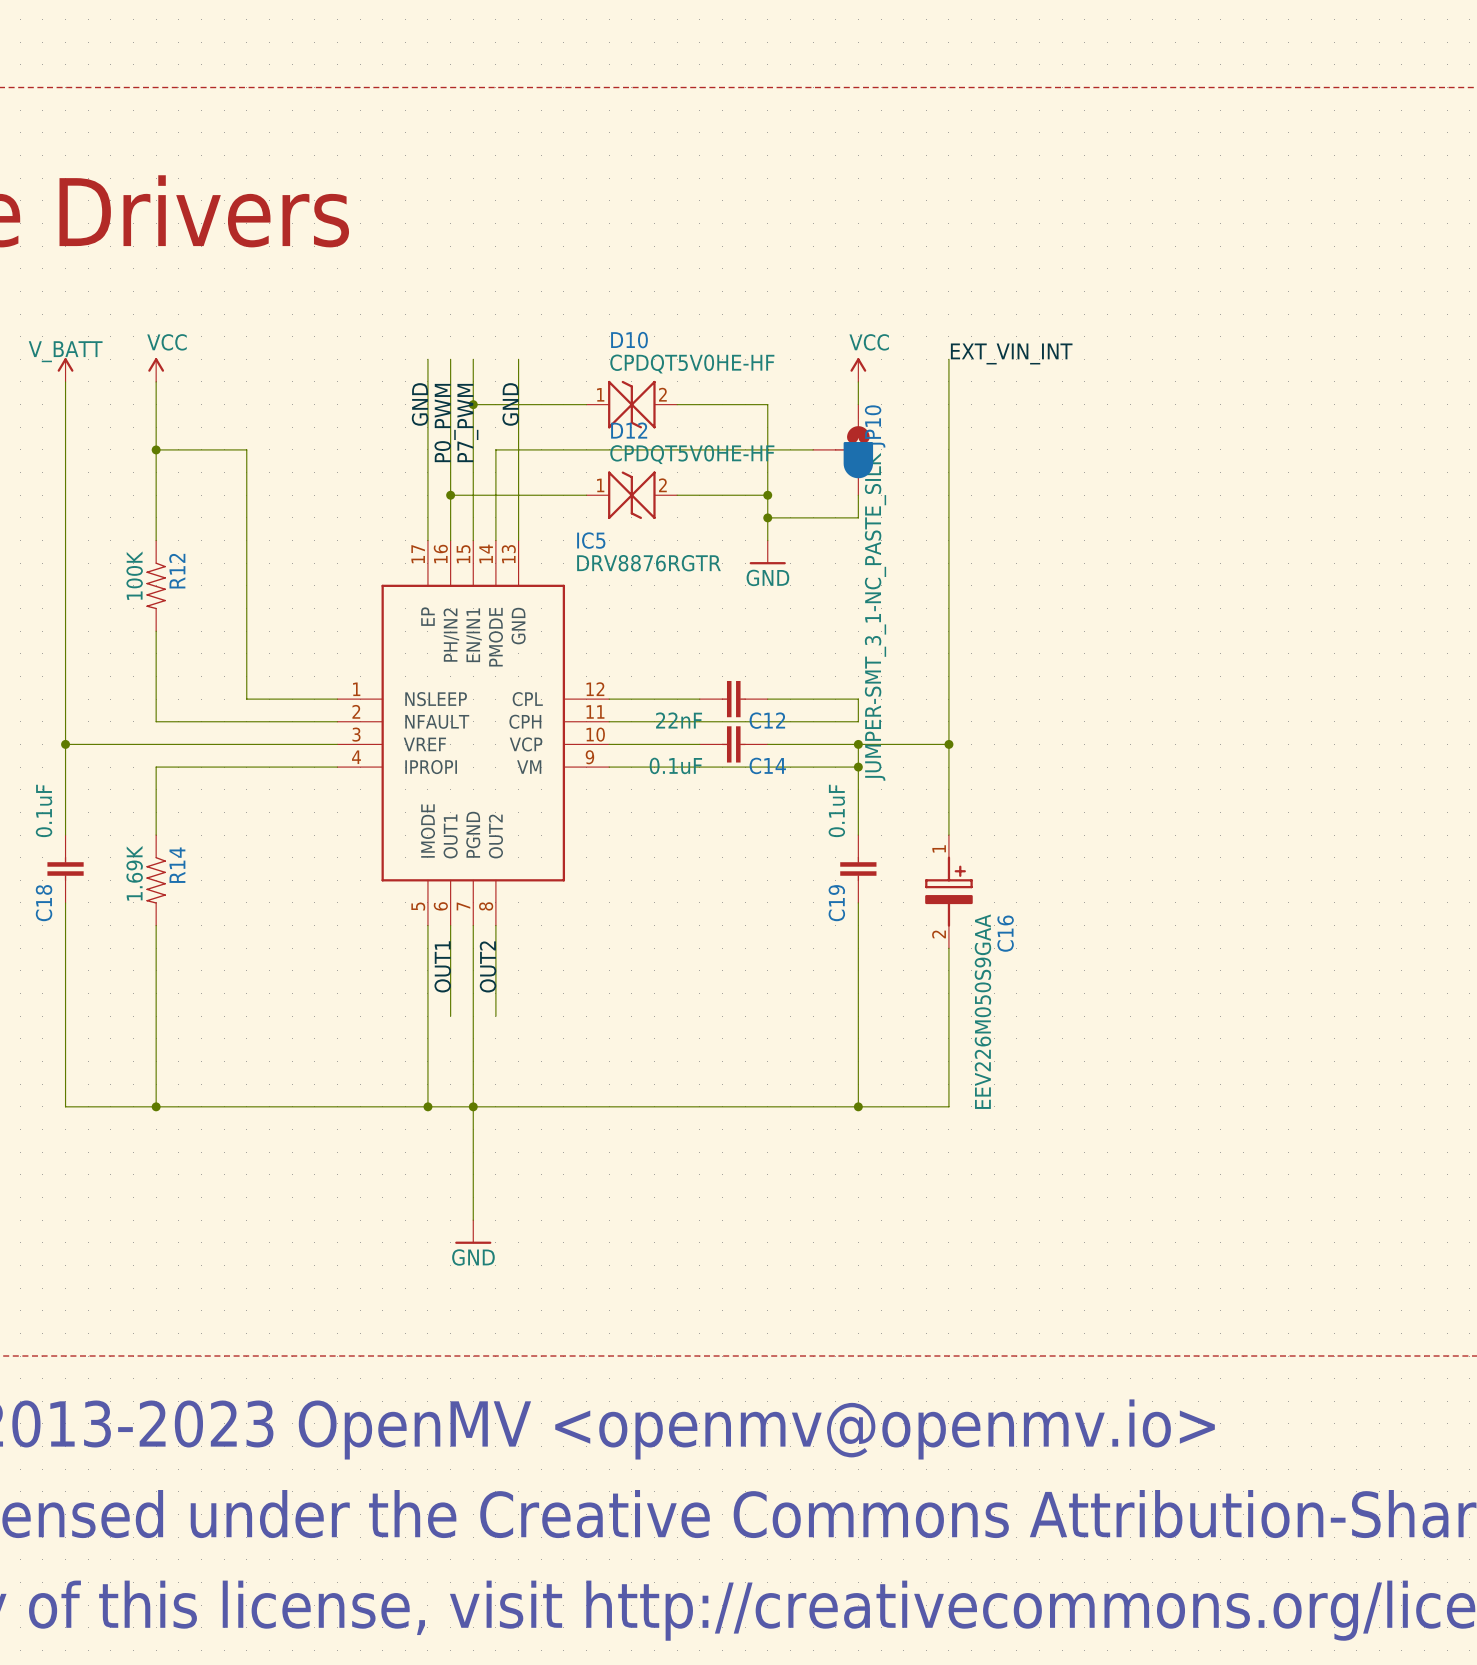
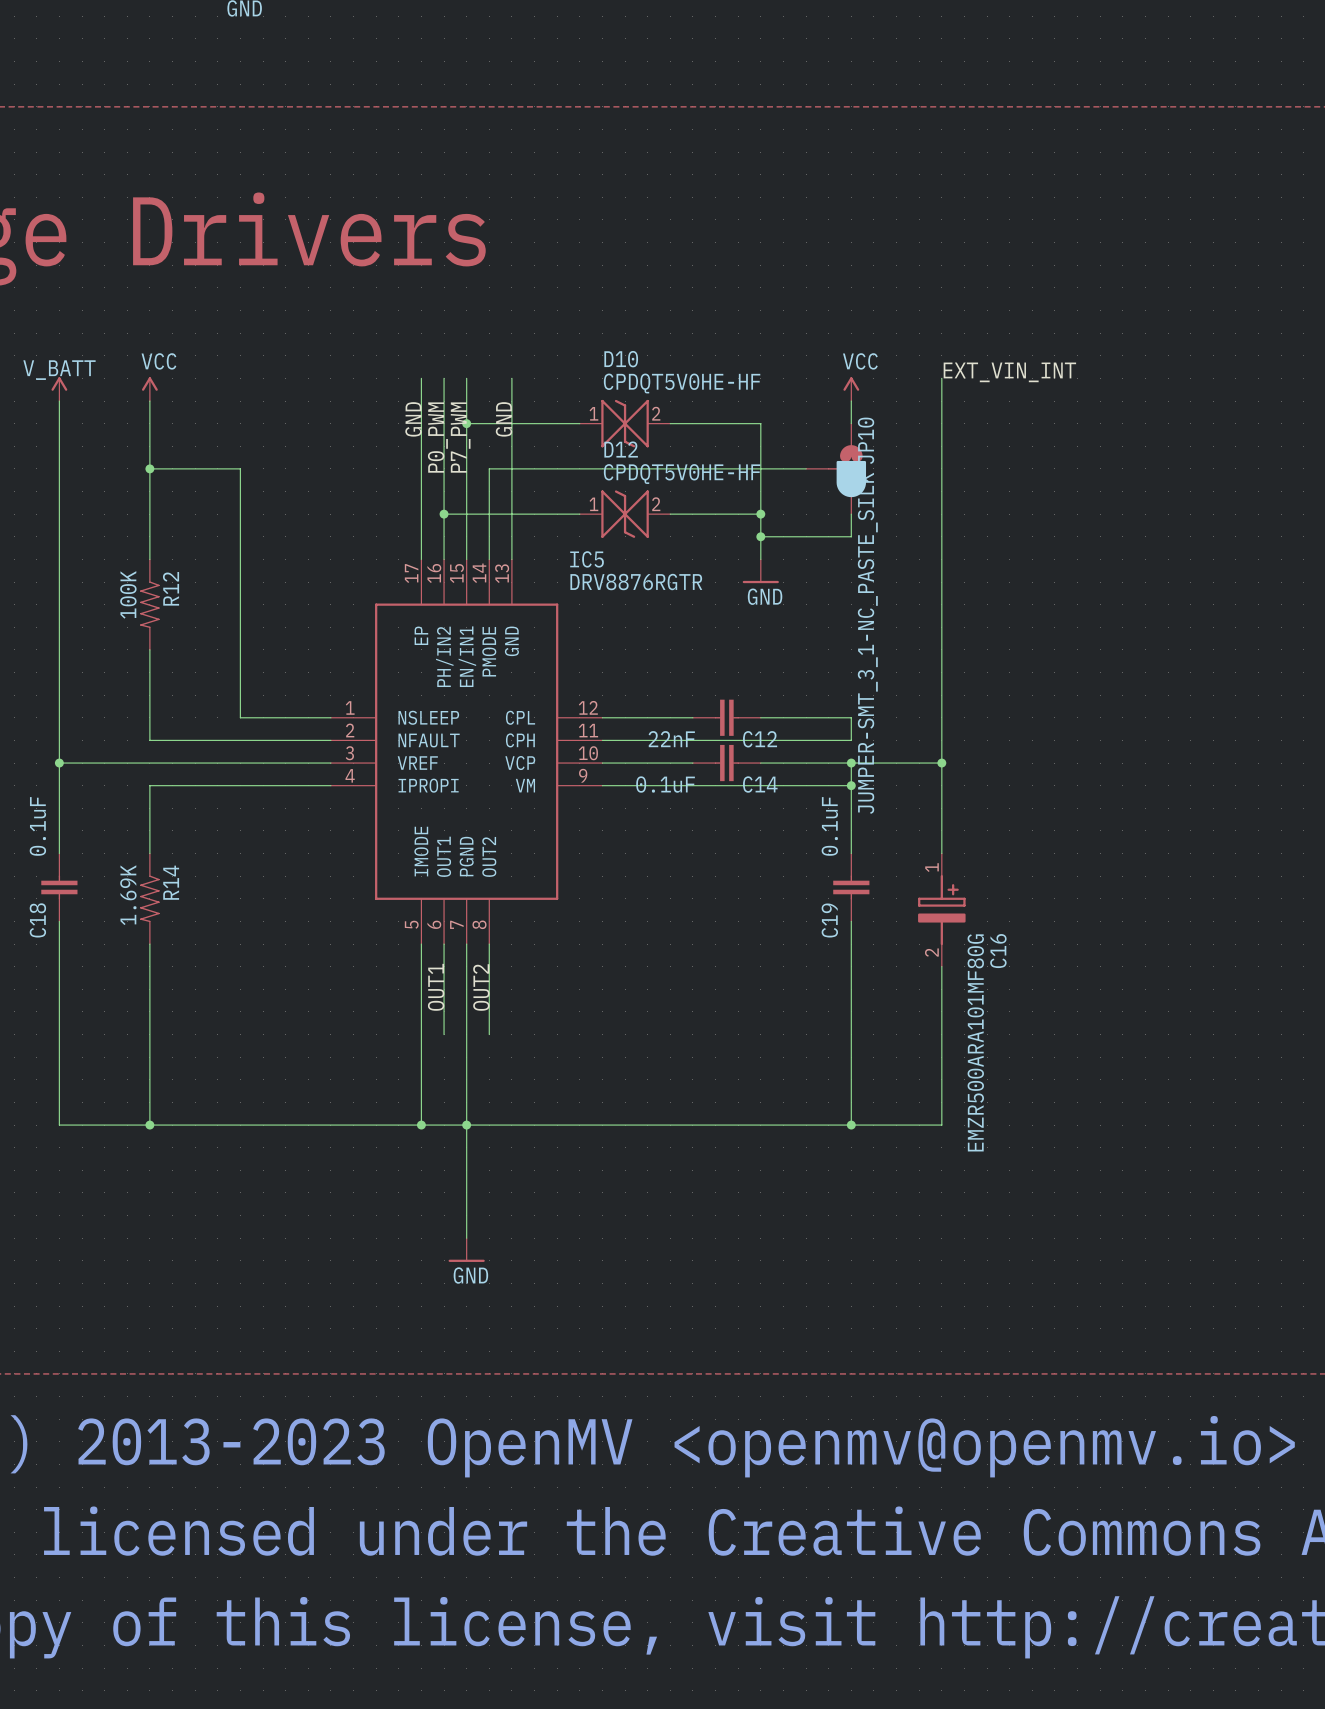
C16 value: EEV226M050S9GAA (982, 1011) -> EMZR500ARA101MF80G (975, 1042)

